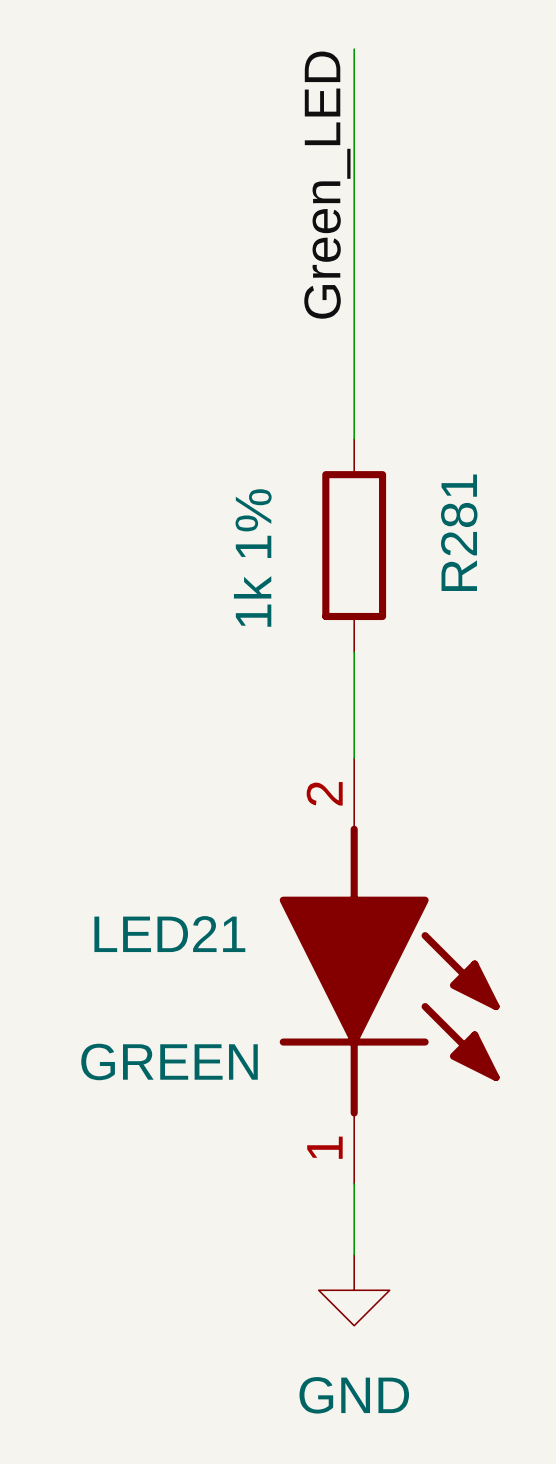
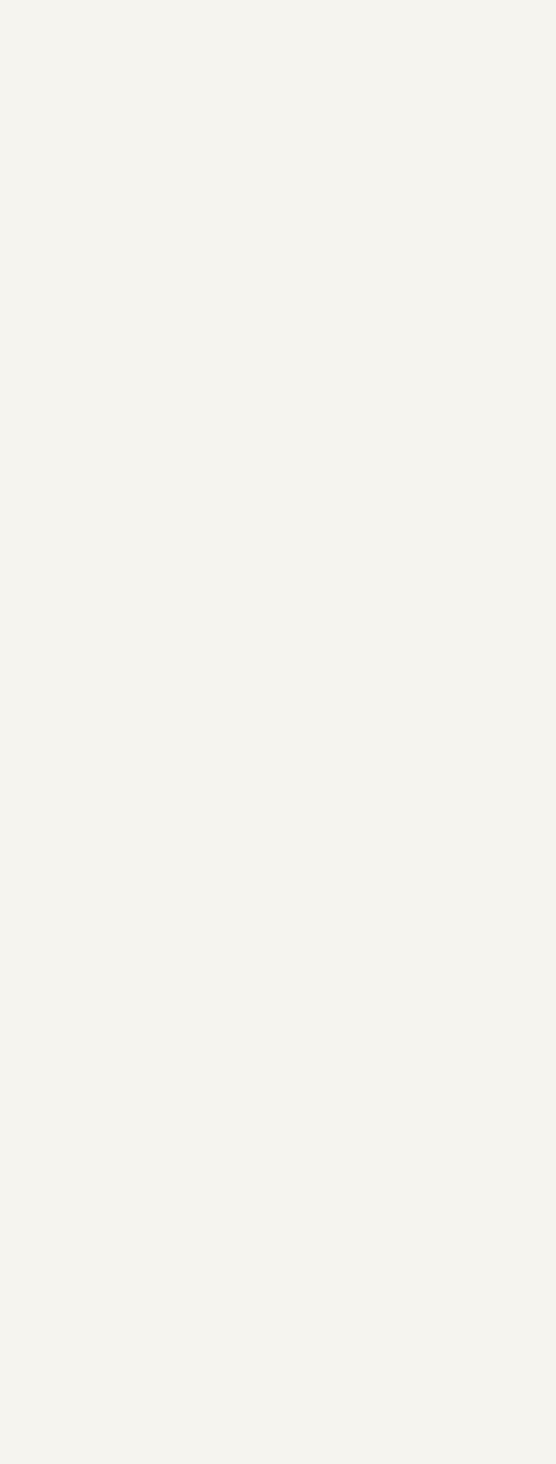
wire: (354, 49) (354, 439) -> none
label: Green_LED (327, 185) -> none
R281: 1k 1% (354, 545) -> none
wire: (354, 651) (354, 758) -> none
LED21: GREEN (389, 971) -> none
wire: (354, 1183) (354, 1254) -> none
power symbol: GND (354, 1290) -> none

